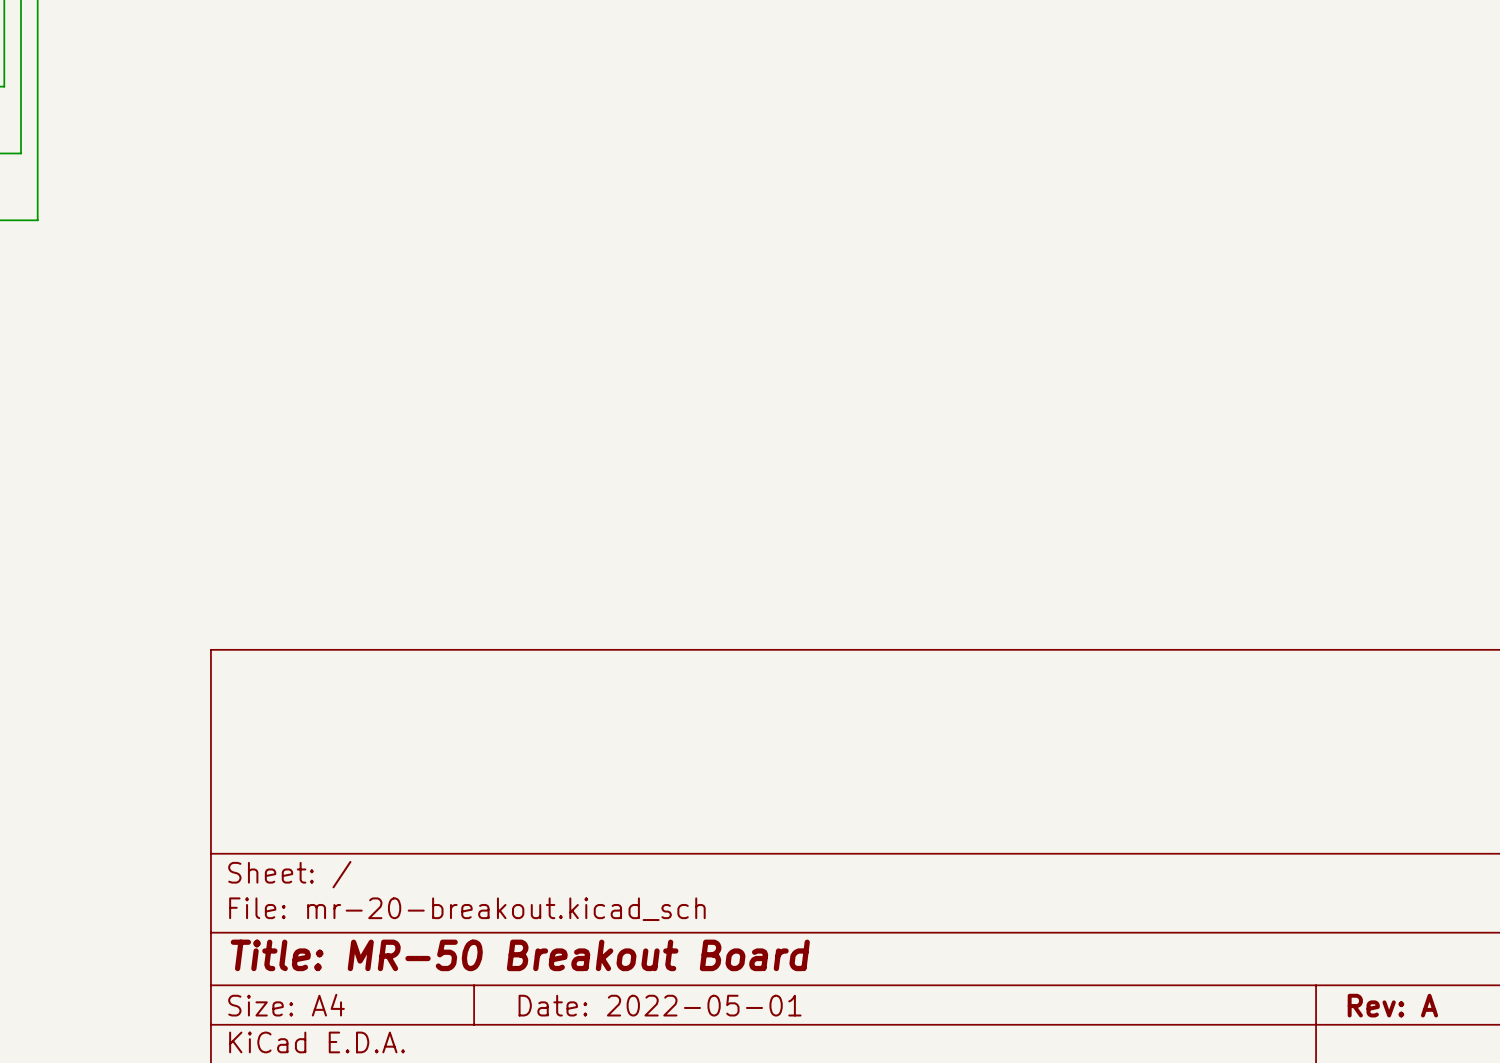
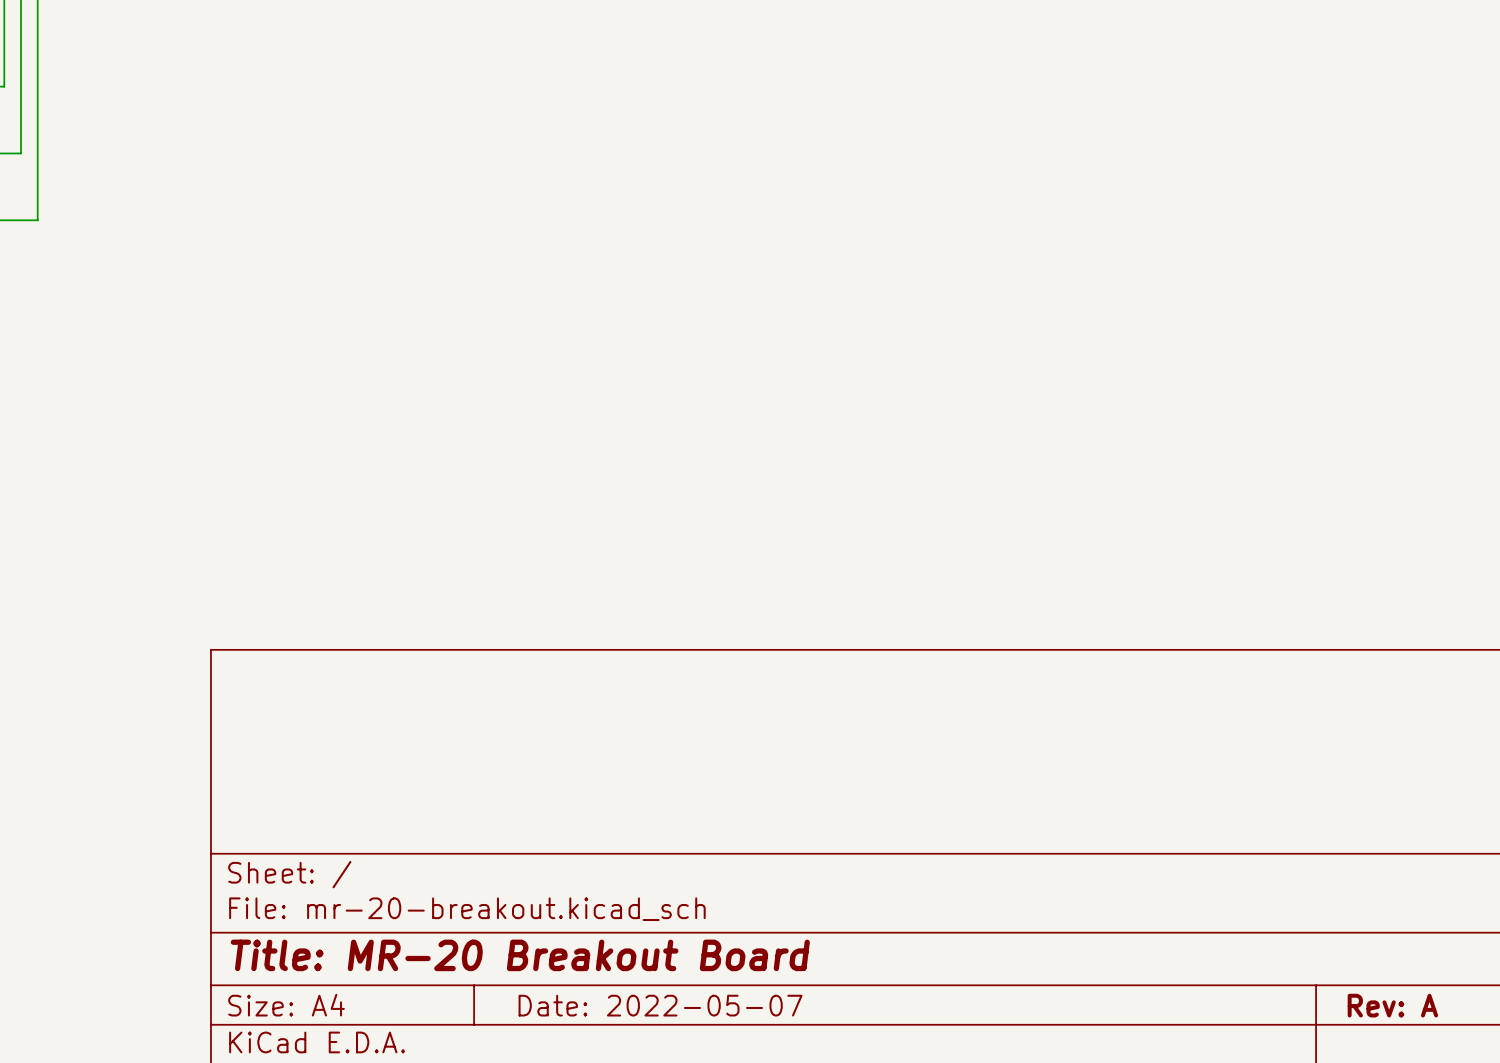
title block: Title: MR-50 Breakout Board (520, 955) -> Title: MR-20 Breakout Board (520, 955)
title block: Date: 2022-05-01 (660, 1005) -> Date: 2022-05-07 (660, 1005)

